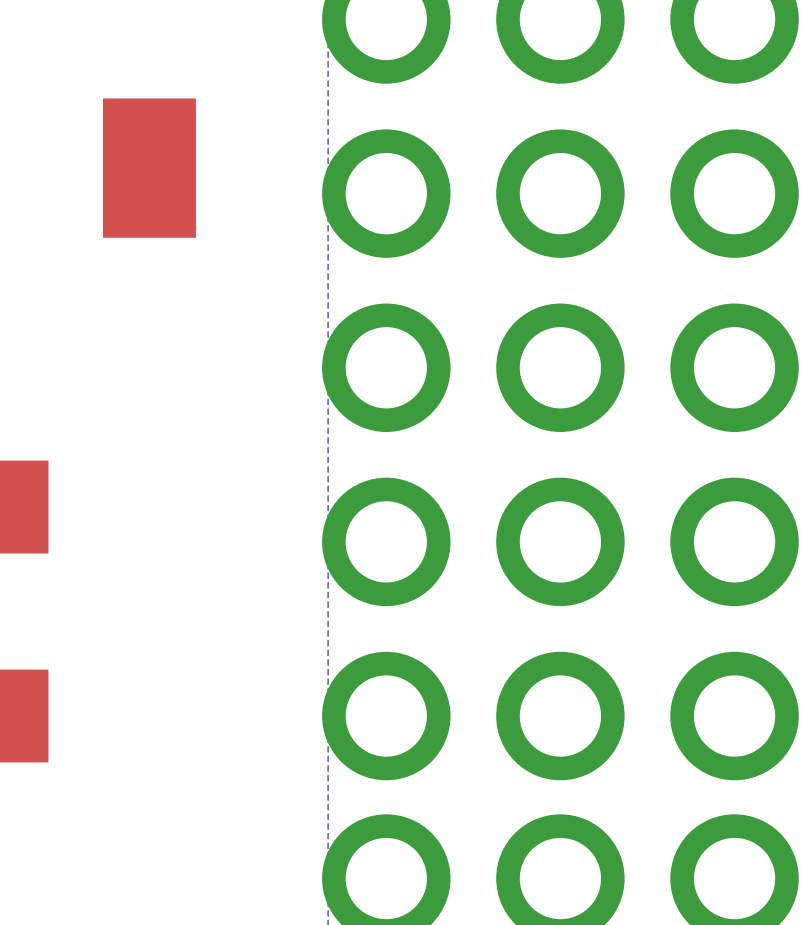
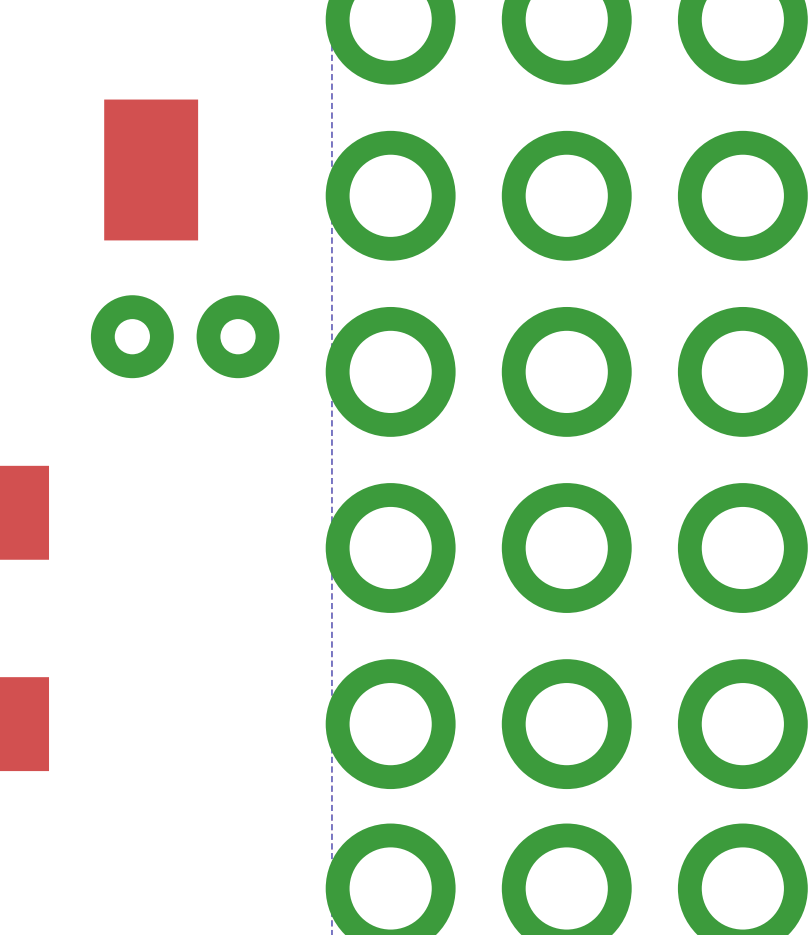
via: none -> (132, 336)
via: none -> (238, 336)

